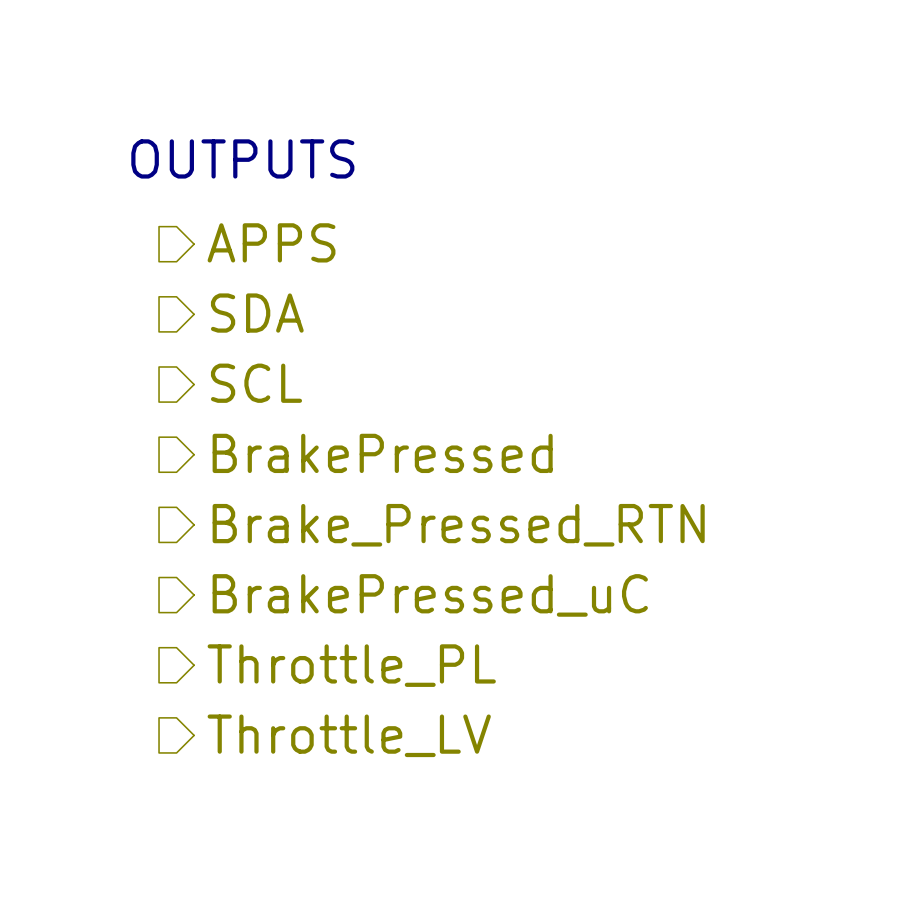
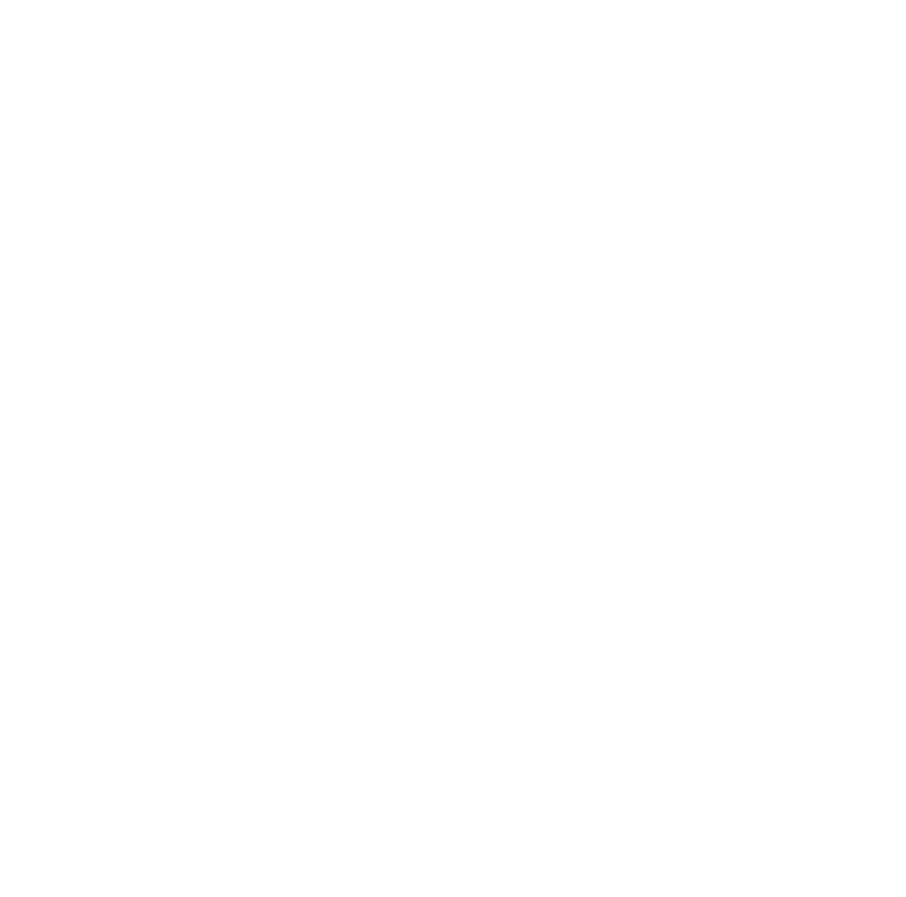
text: OUTPUTS (242, 158) -> none
hierarchical label: APPS (271, 242) -> none
hierarchical label: SDA (257, 313) -> none
hierarchical label: SCL (256, 383) -> none
hierarchical label: BrakePressed (382, 453) -> none
hierarchical label: Brake_Pressed_RTN (458, 525) -> none
hierarchical label: BrakePressed_uC (430, 595) -> none
hierarchical label: Throttle_PL (351, 665) -> none
hierarchical label: Throttle_LV (349, 735) -> none

